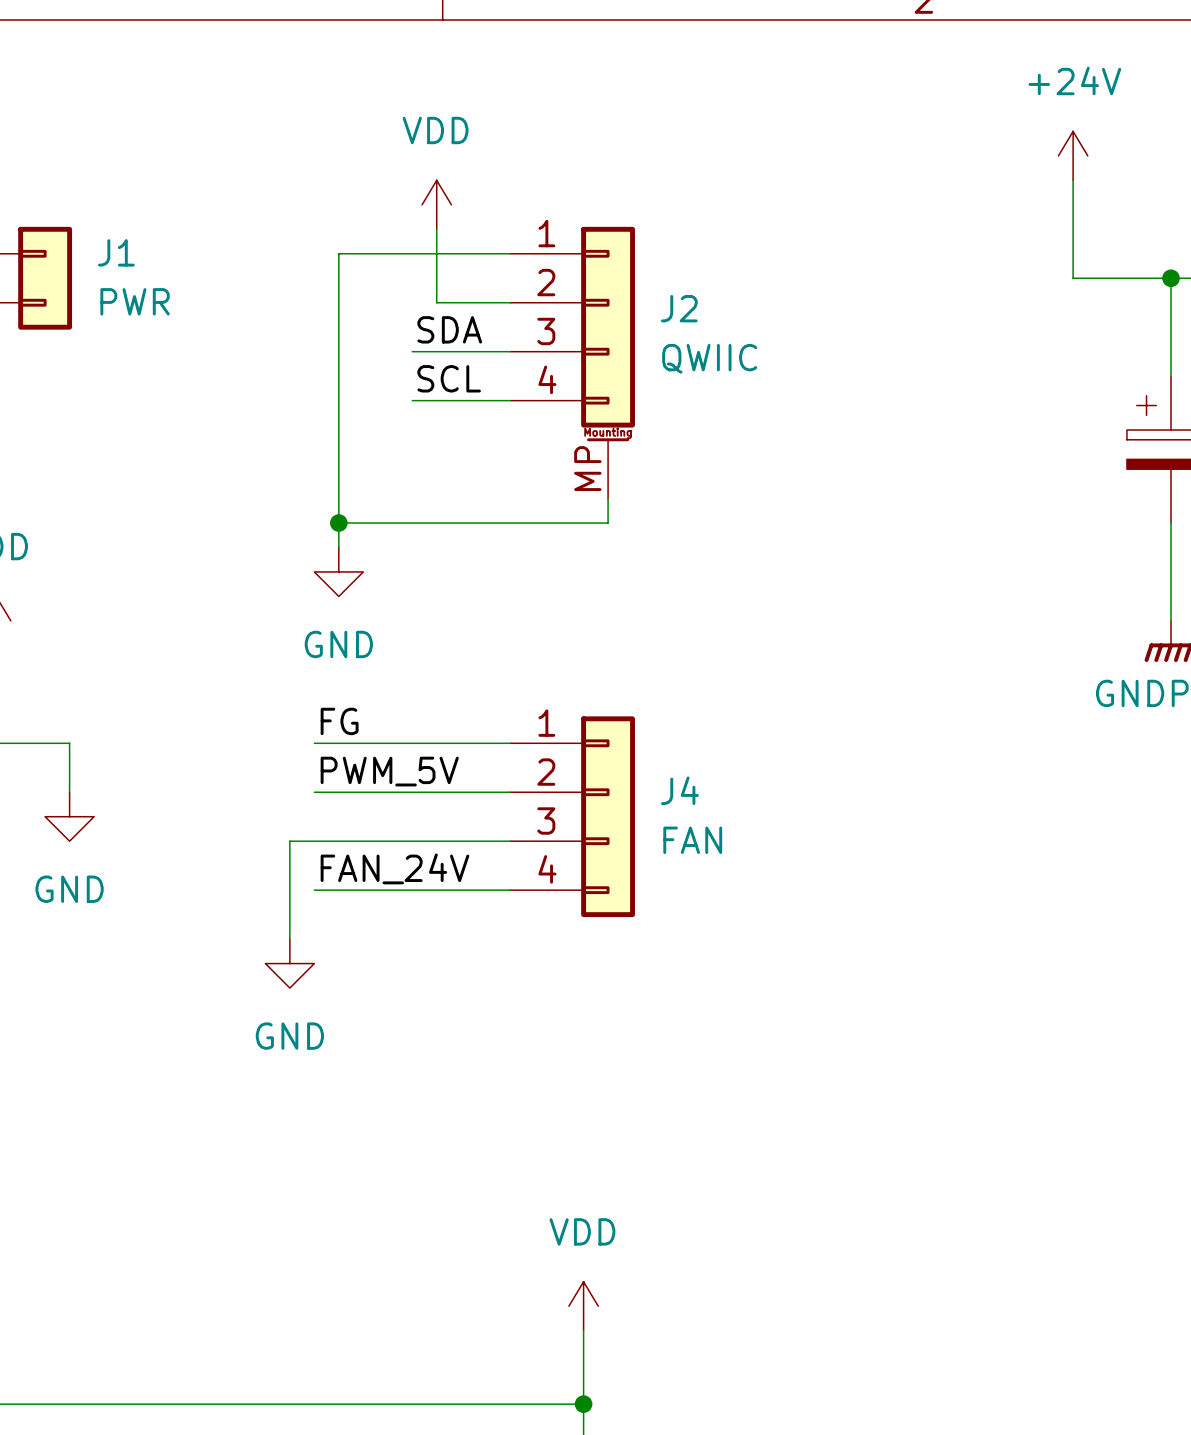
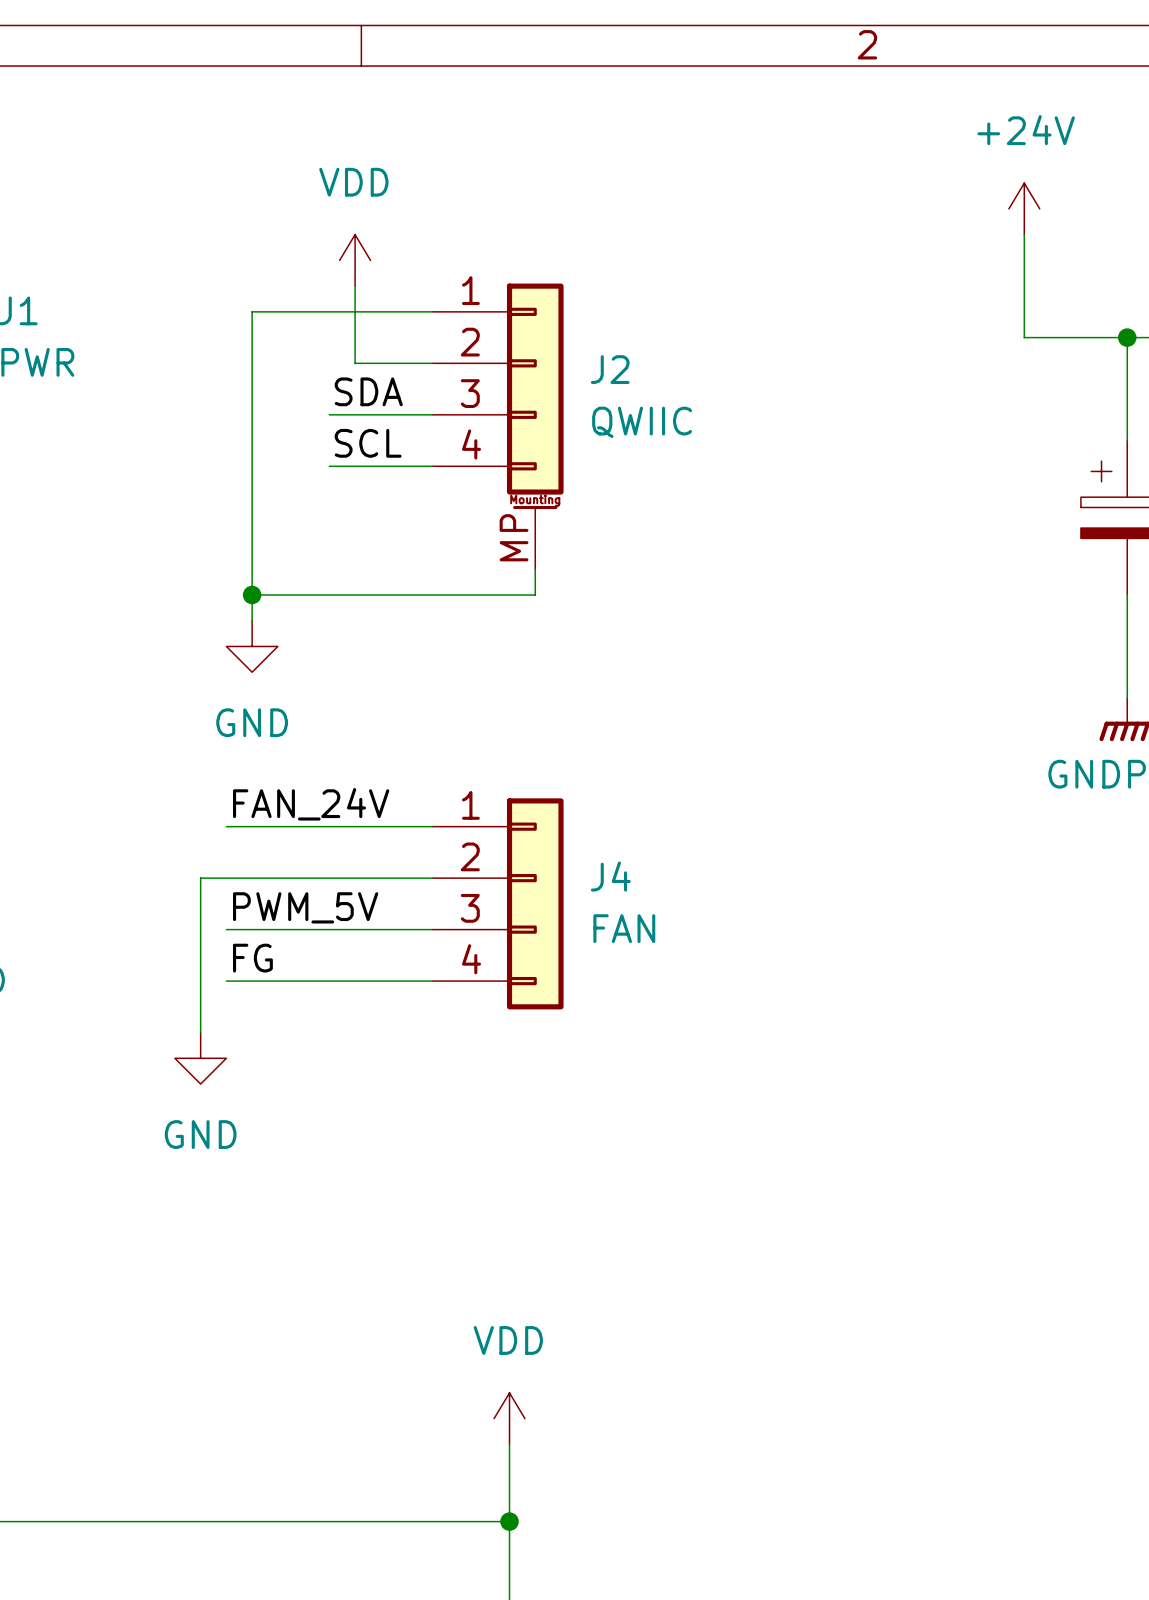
label: FG (339, 721) -> FAN_24V (311, 804)
label position: PWM_5V (389, 771) -> PWM_5V (305, 907)
wire: (289, 841) (314, 841) -> (200, 929) (200, 878) (226, 878)
label: FAN_24V (394, 868) -> FG (252, 958)

